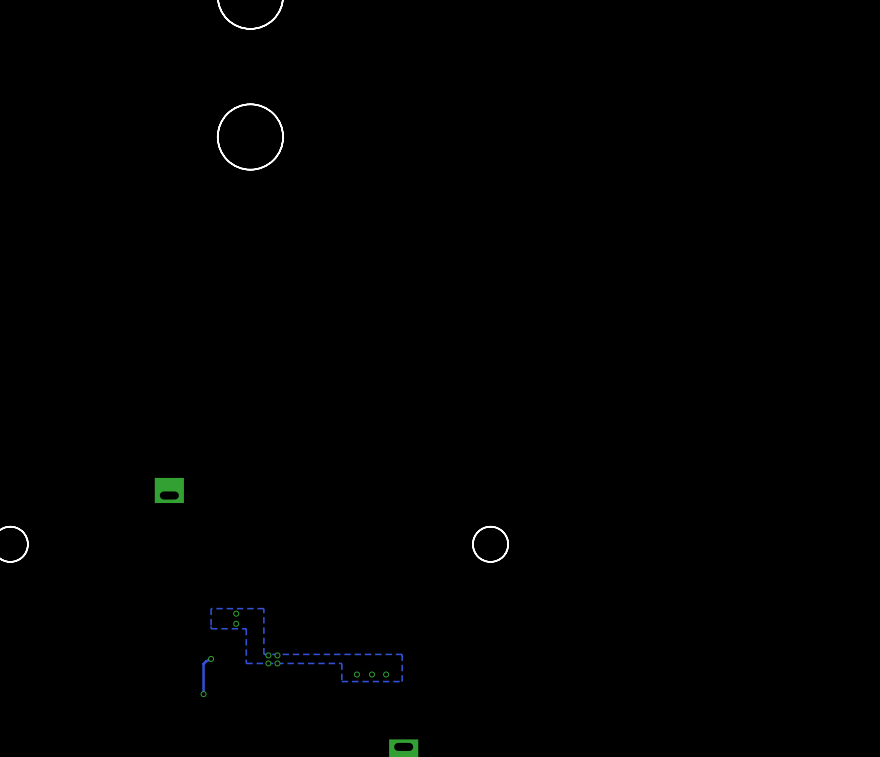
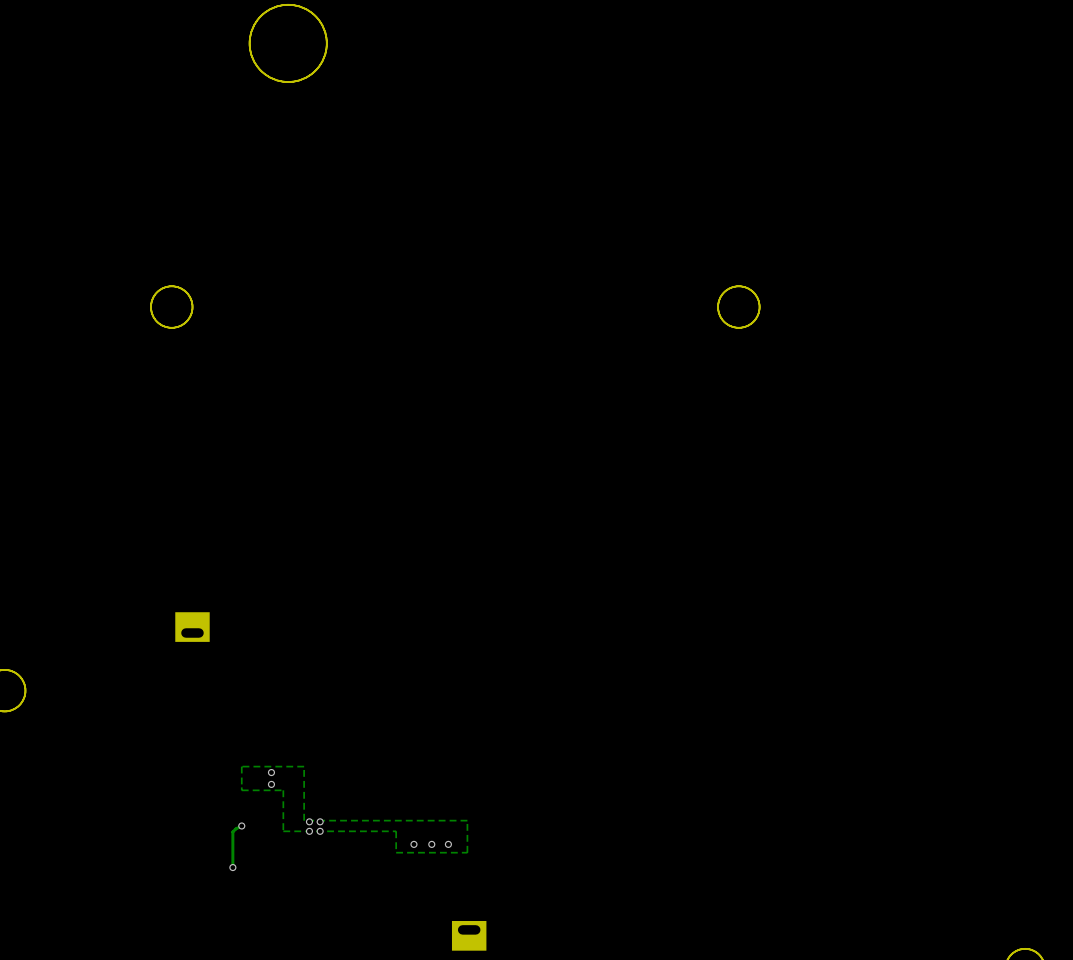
round board edge: [217, 103, 284, 171] -> none
round board edge: none -> [150, 285, 194, 329]
round board edge: none -> [717, 285, 761, 329]
round board edge: [472, 526, 509, 563] -> none

